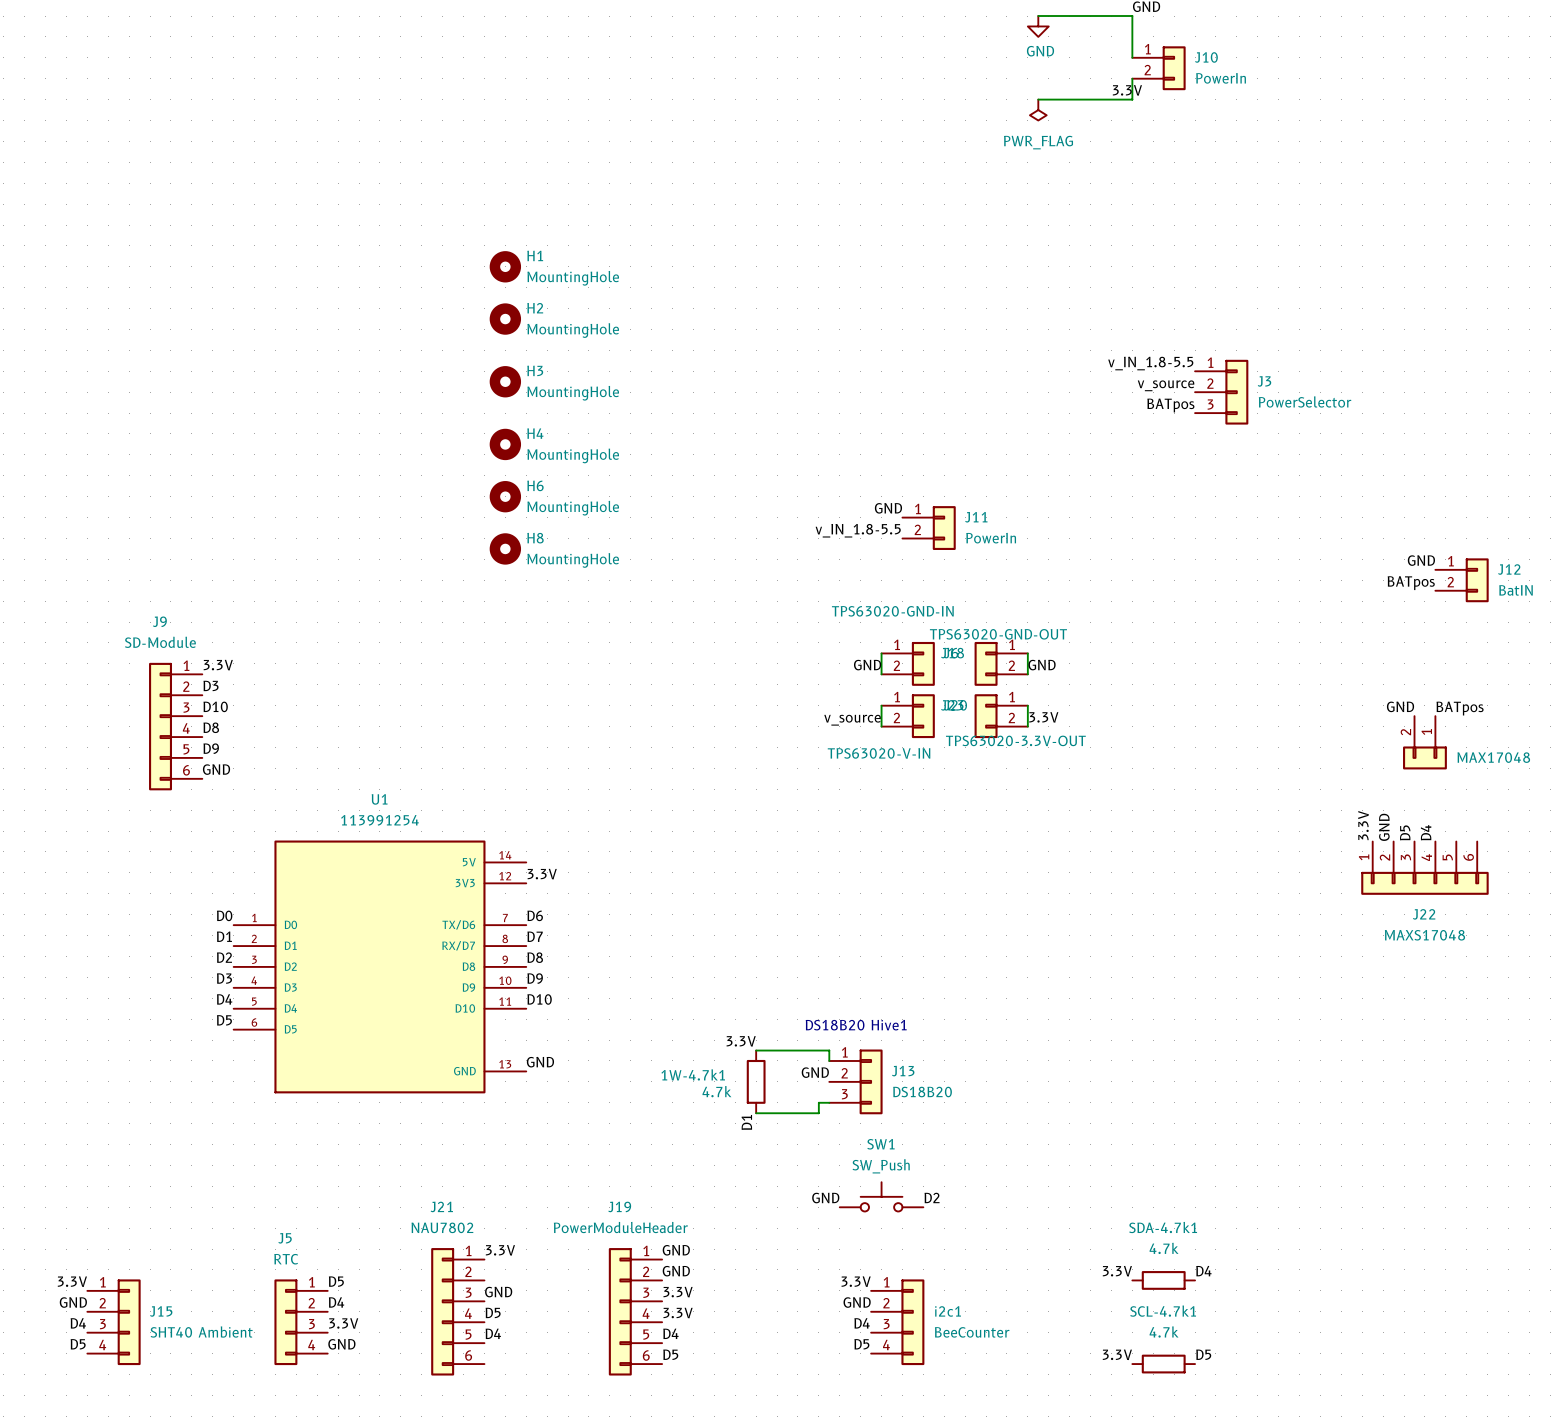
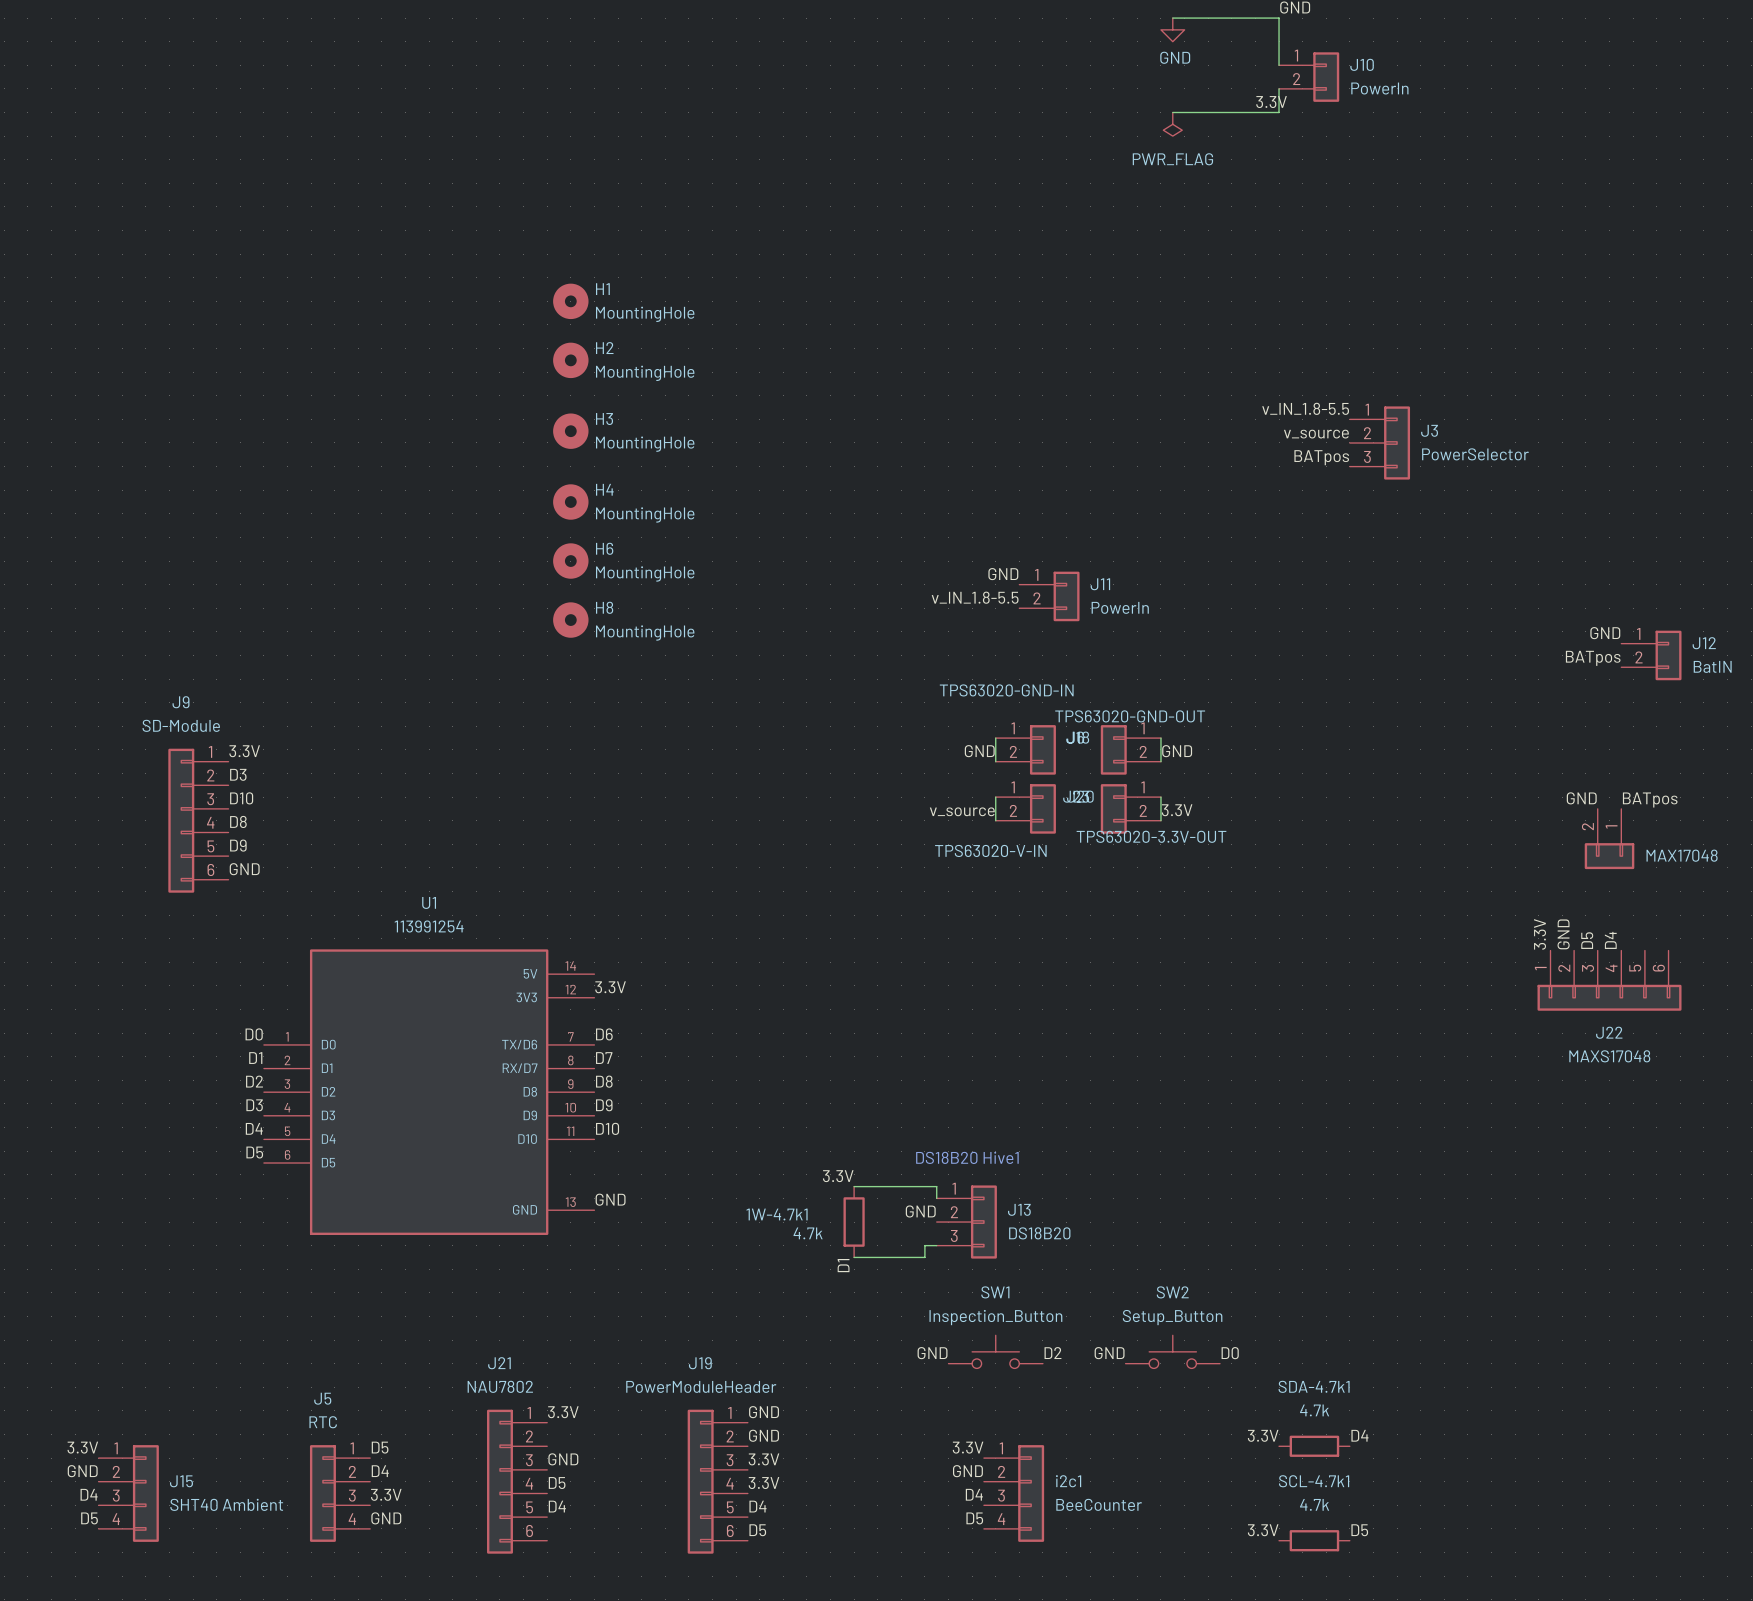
SW1 value: SW_Push (881, 1166) -> Inspection_Button (995, 1317)
SW2: none -> Setup_Button (1172, 1351)
label: none -> GND (1109, 1353)
label: none -> D0 (1230, 1353)

